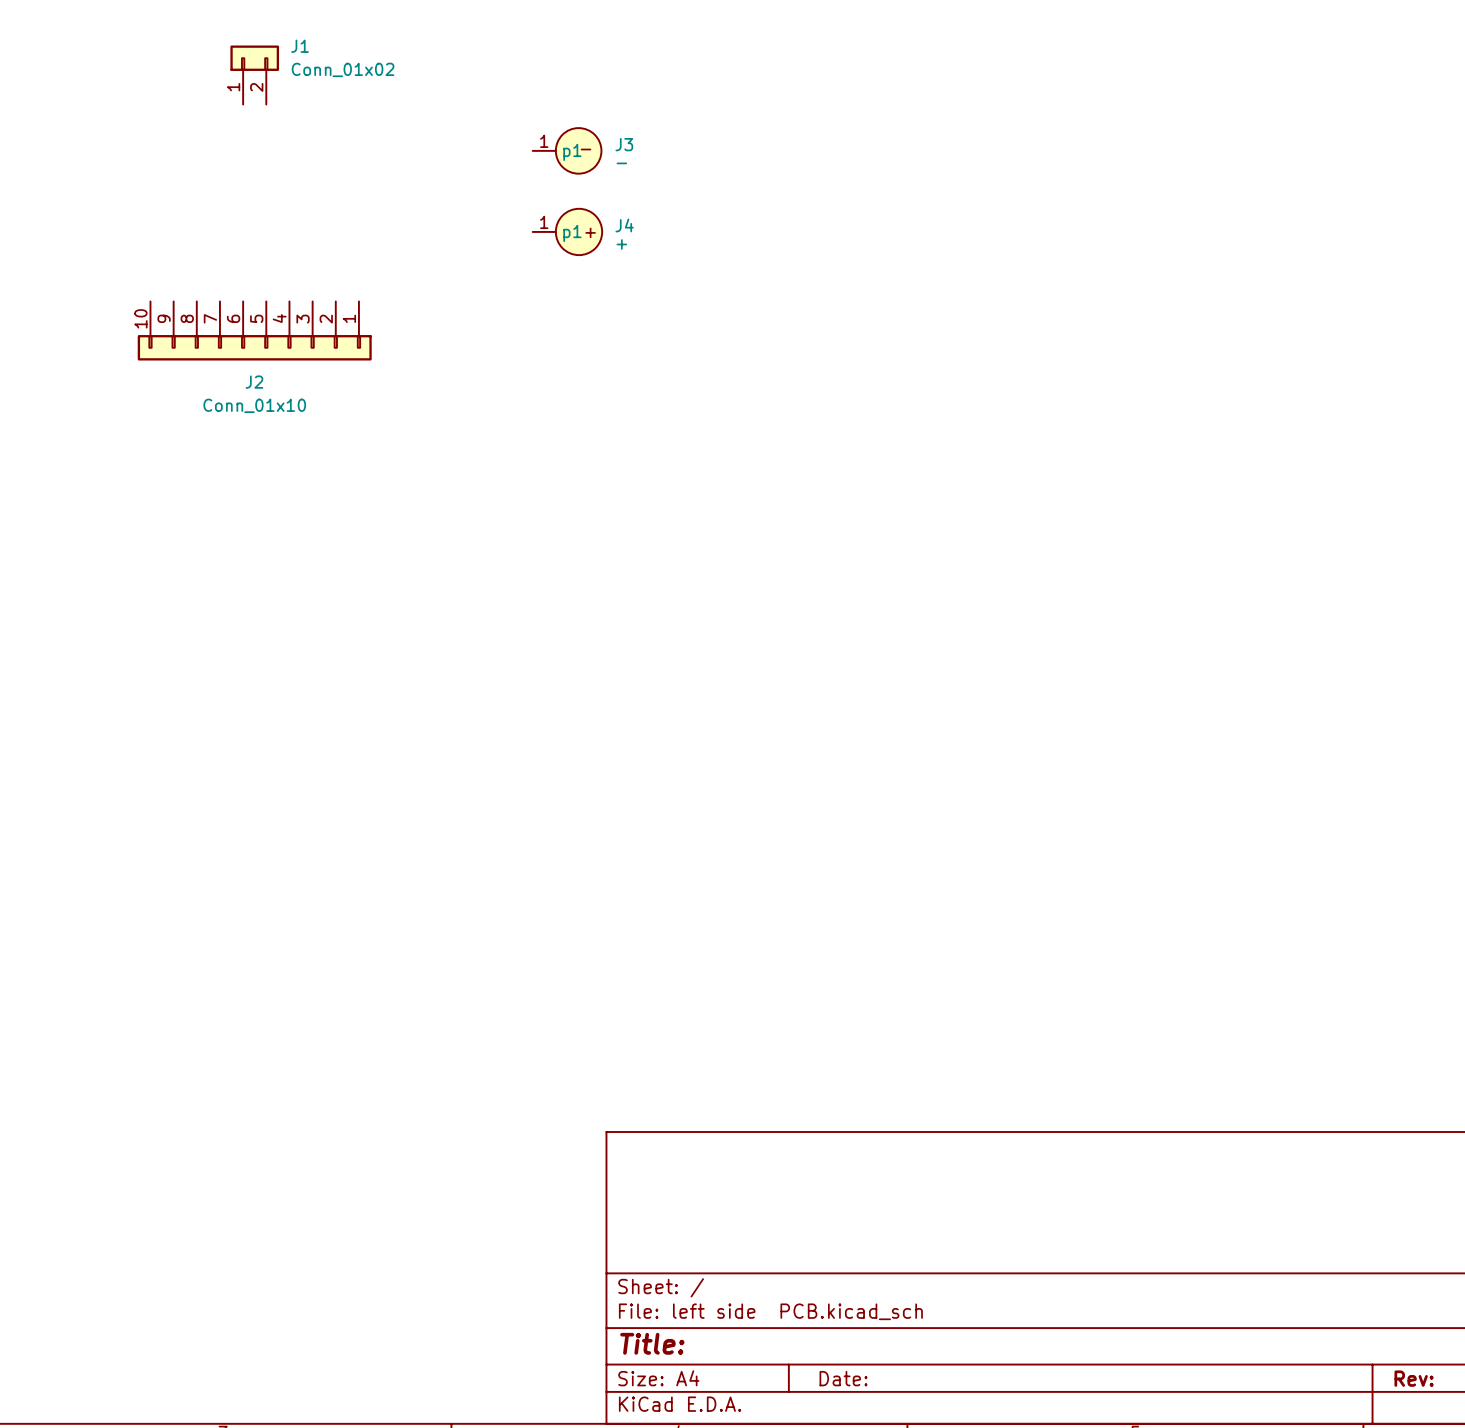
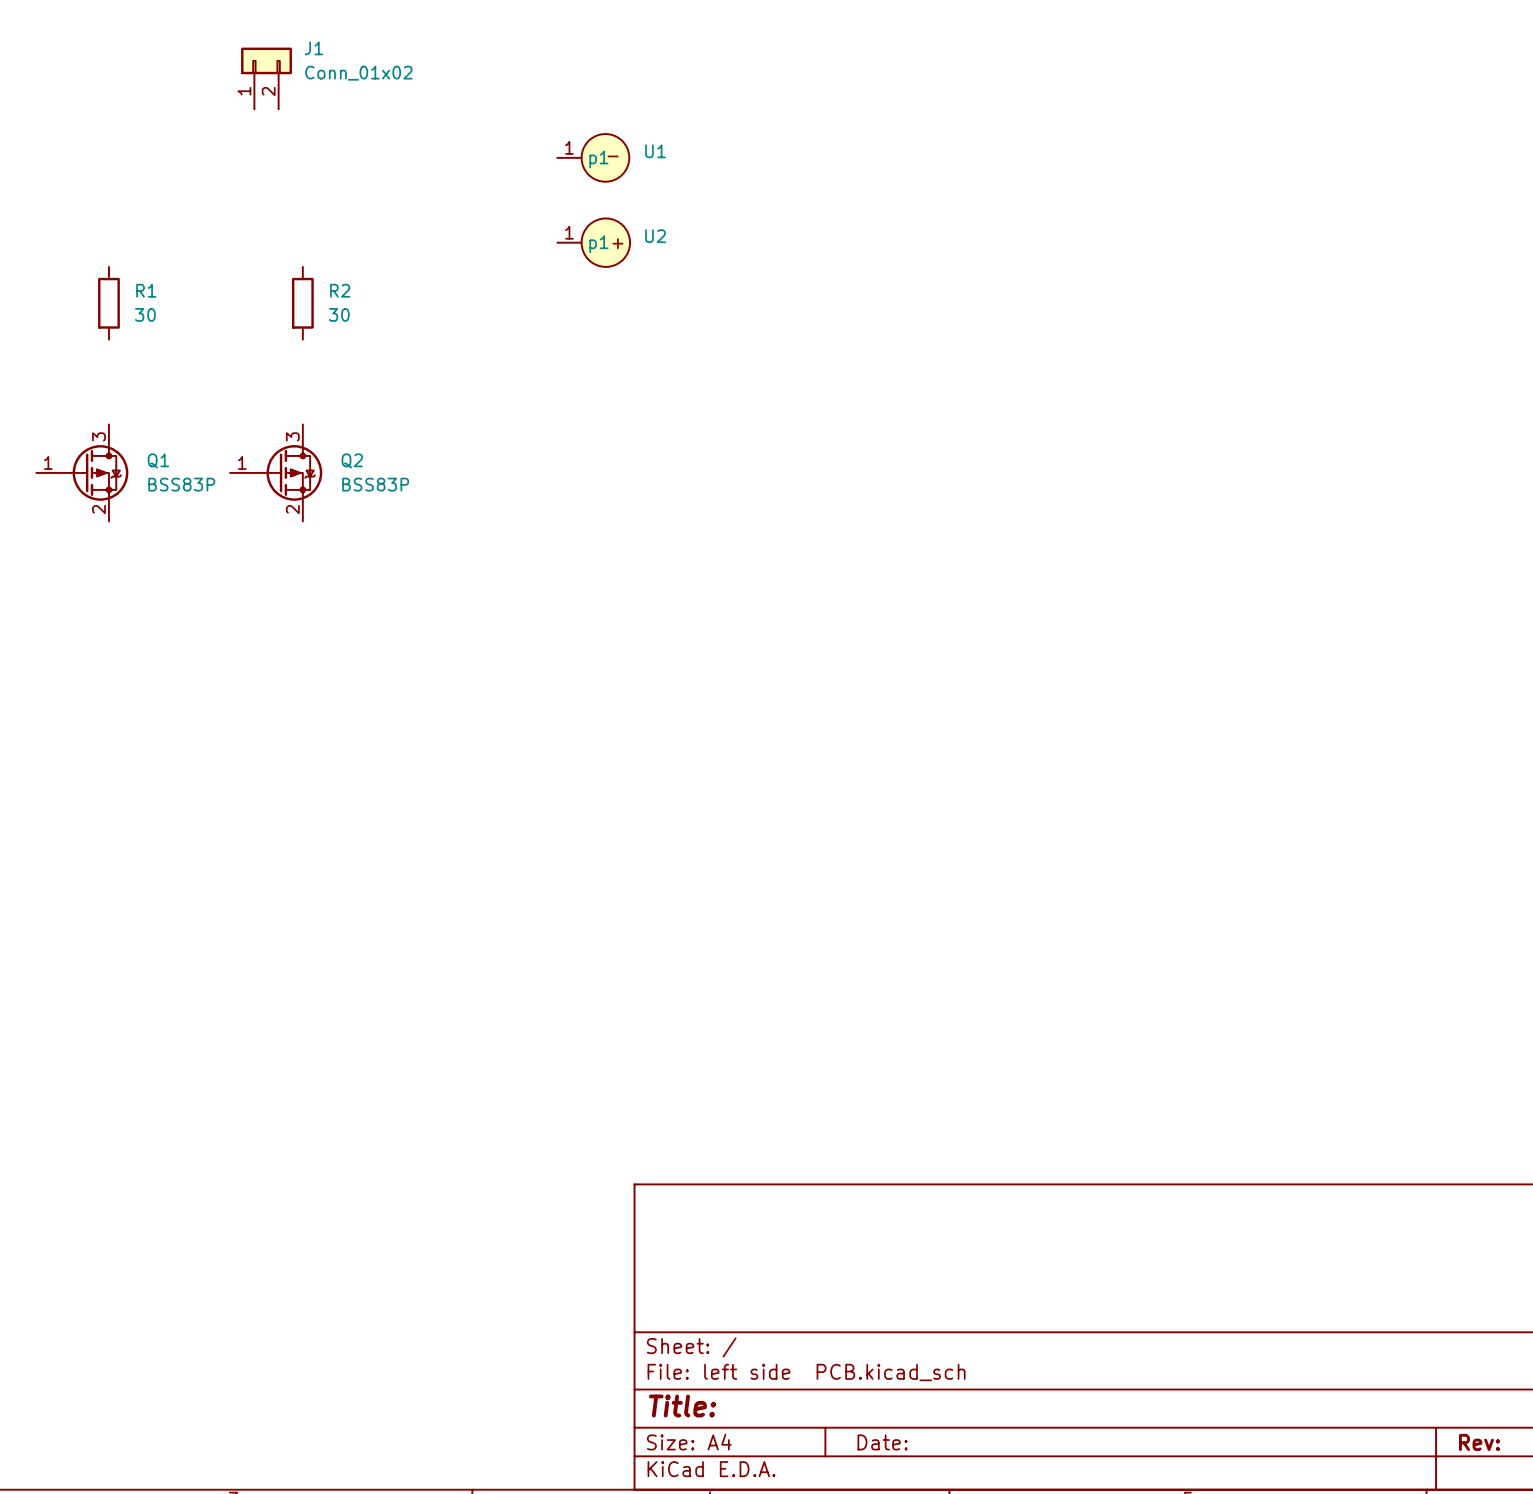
J3 name: J3 (624, 144) -> U1 (655, 151)
J3 value: - (621, 163) -> none
J4 name: J4 (624, 225) -> U2 (655, 236)
J4 value: + (621, 244) -> none
R1: none -> 30 (108, 303)
R2: none -> 30 (302, 303)
J2: Conn_01x10 (254, 330) -> none
Q1: none -> BSS83P (82, 472)
Q2: none -> BSS83P (276, 472)

